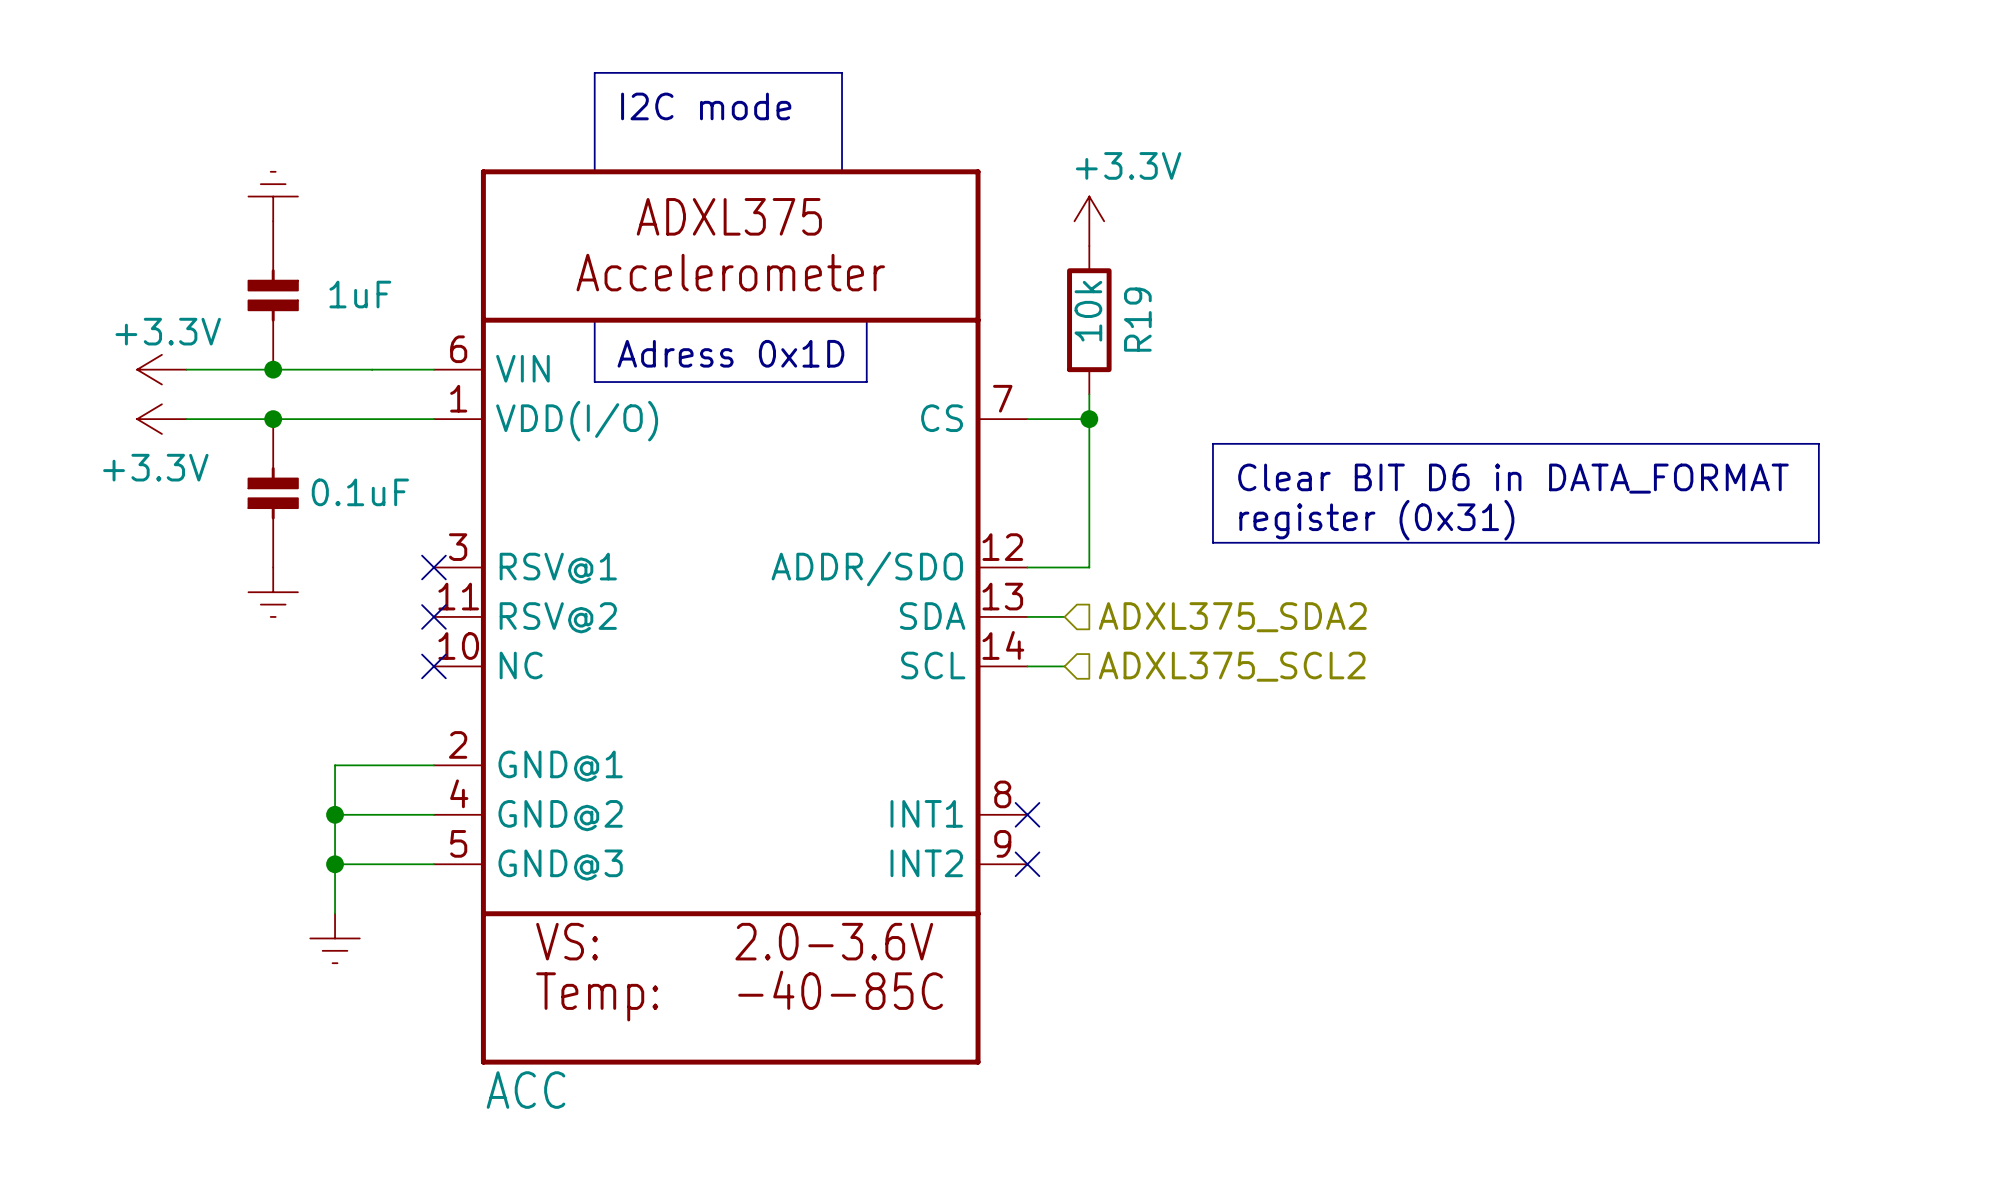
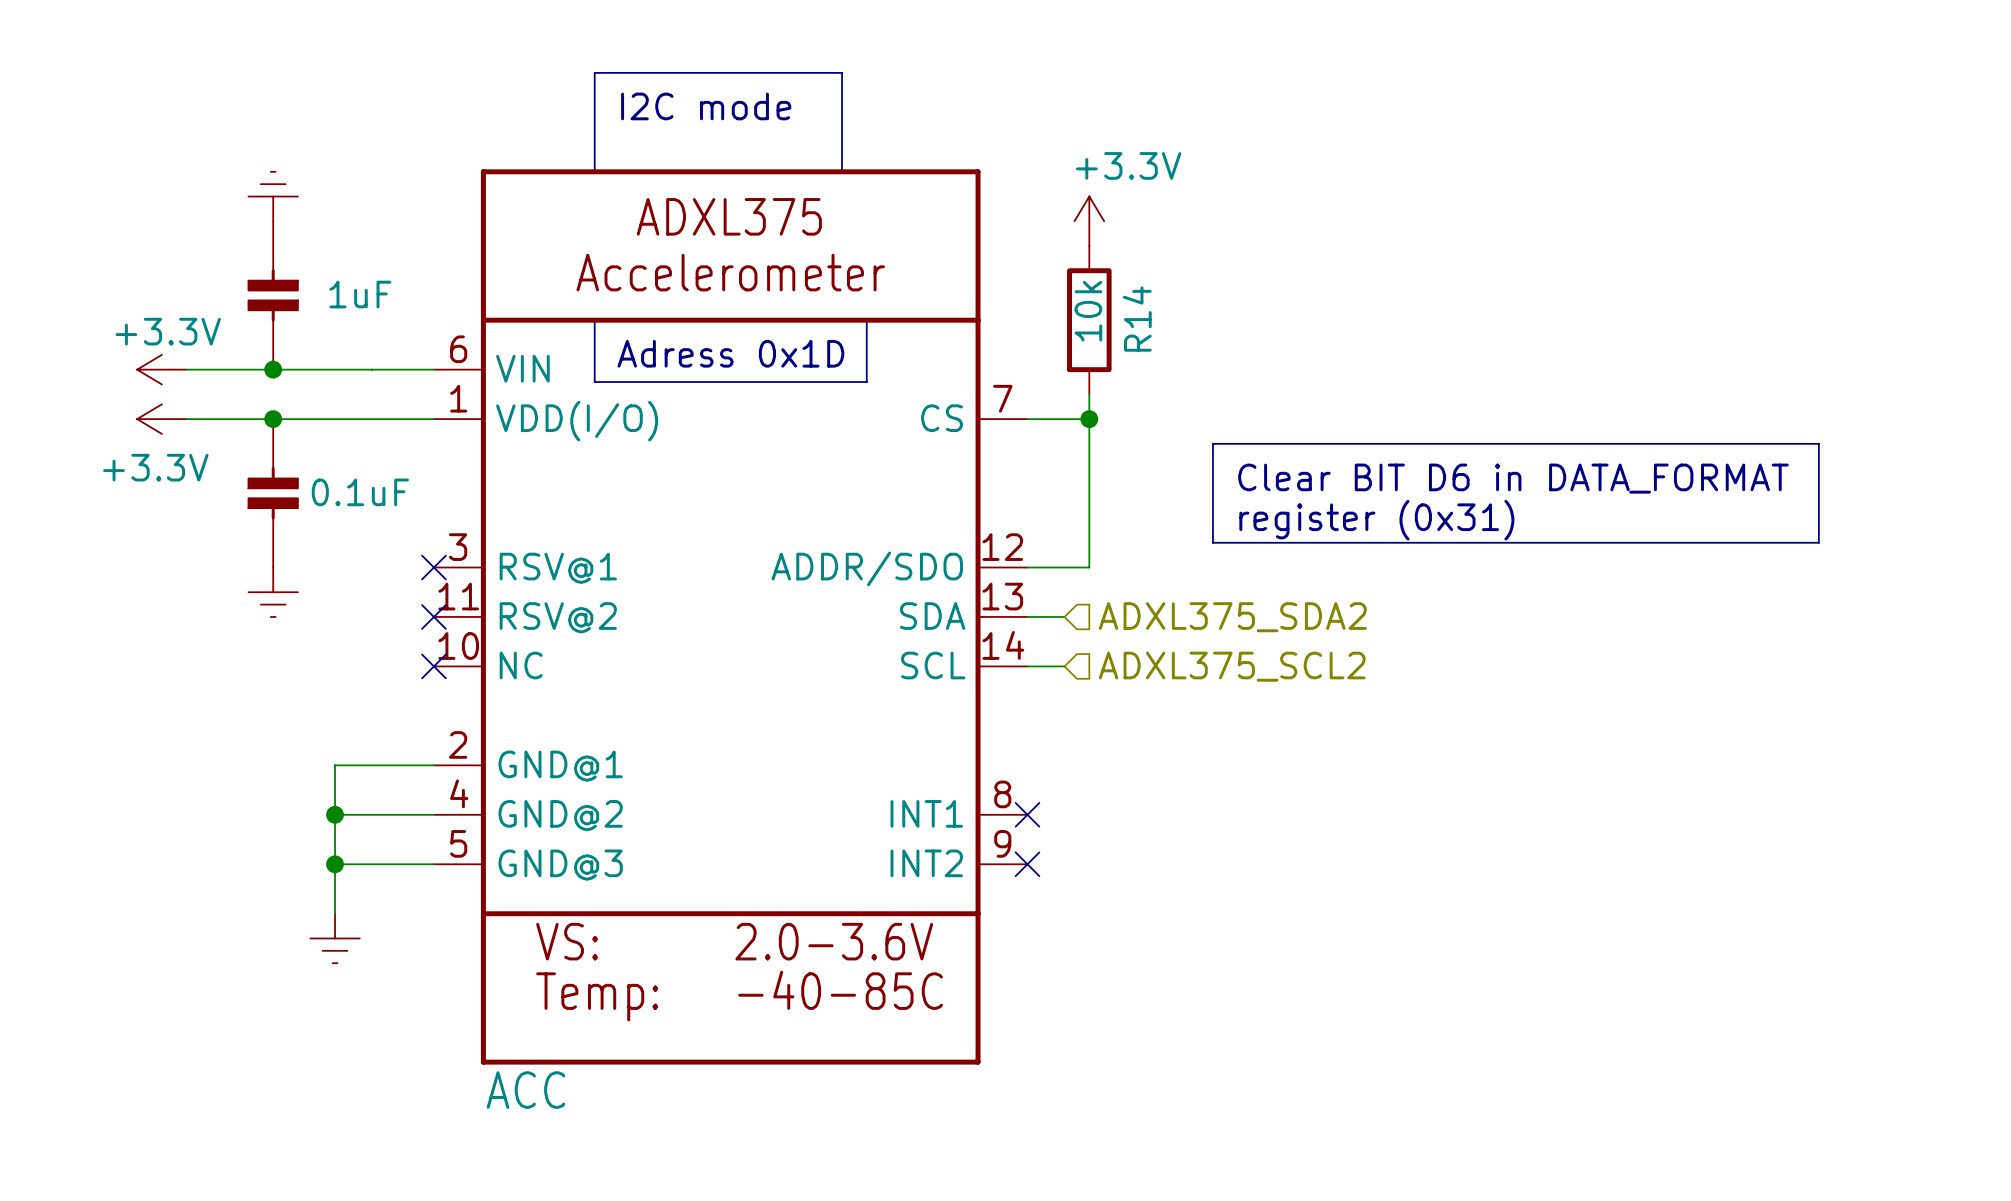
R19 name: R19 (1137, 319) -> R14 (1137, 319)

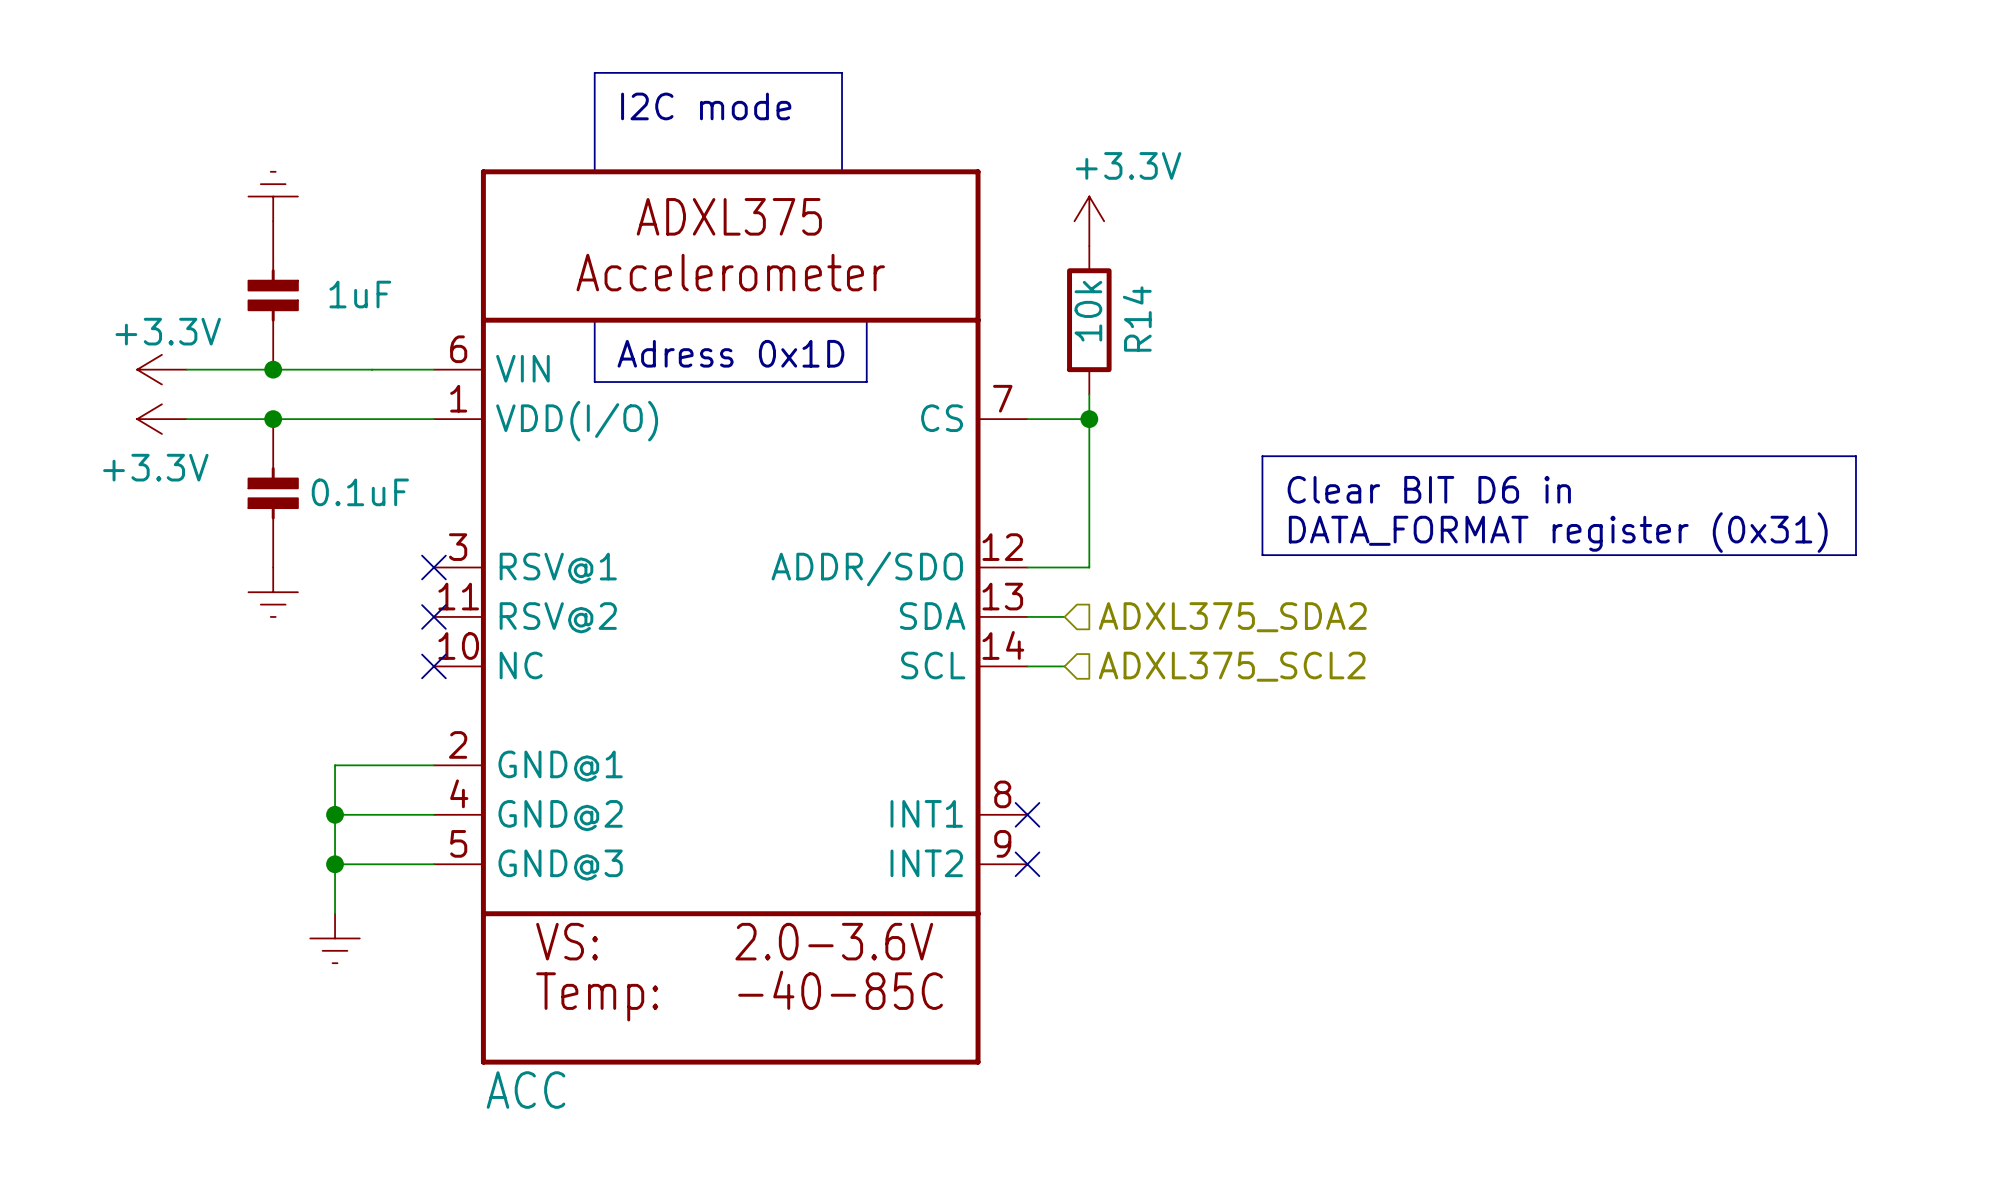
line: (1212, 443) (1818, 443) (1818, 542) (1212, 542) (1212, 443) -> (1262, 456) (1262, 555) (1855, 555) (1855, 456) (1262, 456)
text: Clear BIT D6 in DATA_FORMAT (1513, 478) -> Clear BIT D6 in (1429, 489)
text: register (0x31) (1376, 520) -> DATA_FORMAT register (0x31) (1558, 532)

